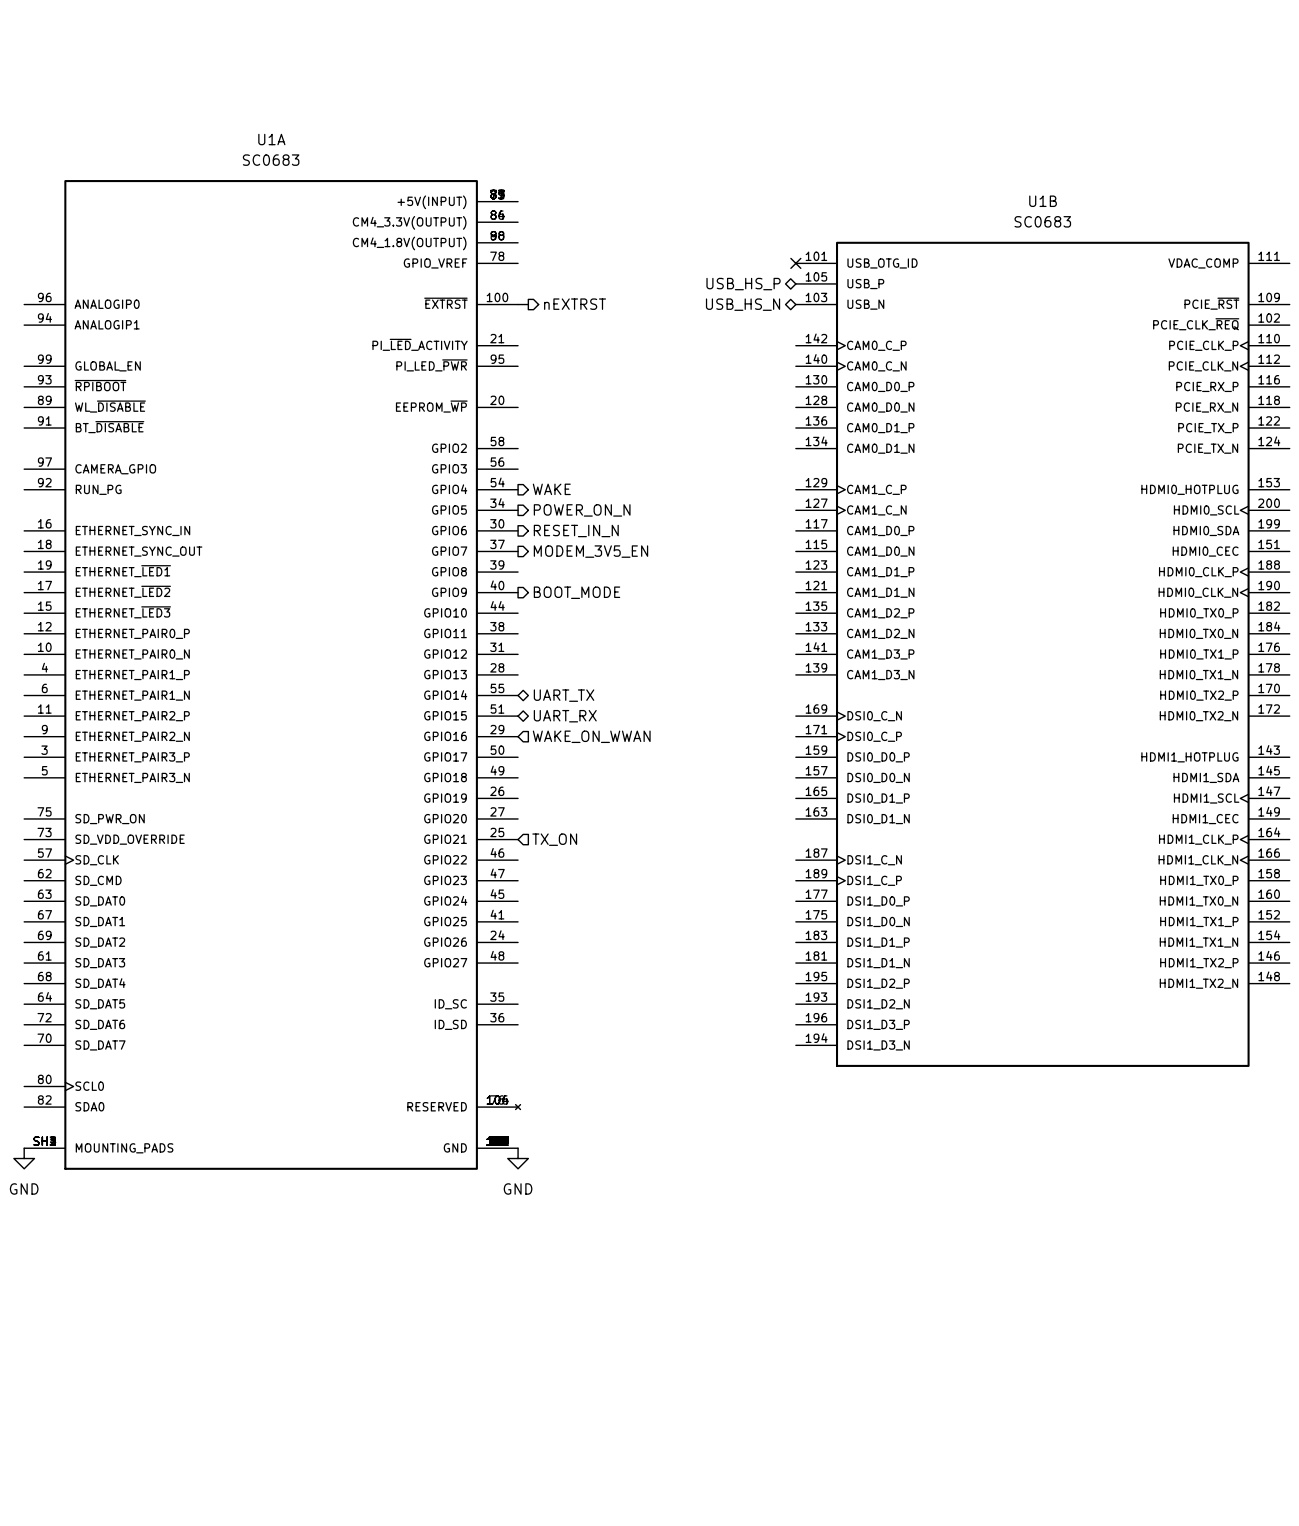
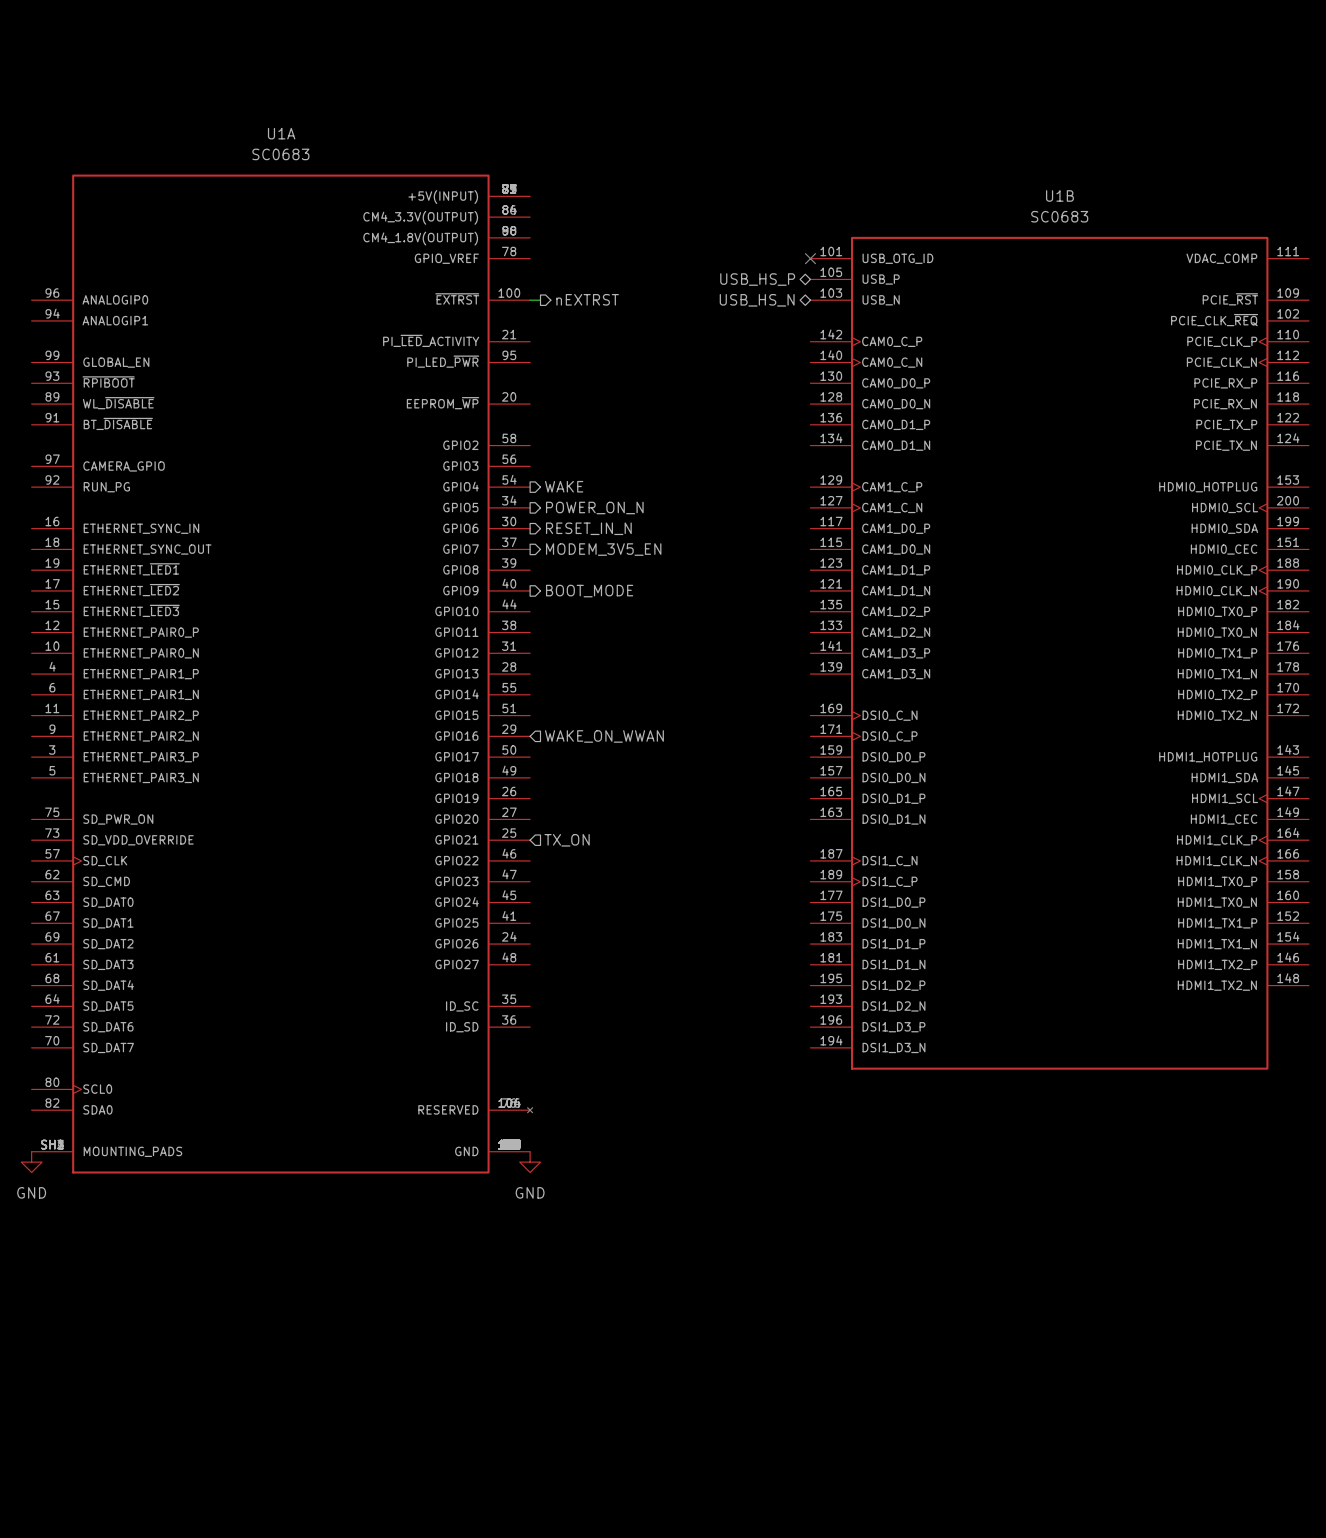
hierarchical label: UART_TX (564, 695) -> none
hierarchical label: UART_RX (565, 716) -> none

